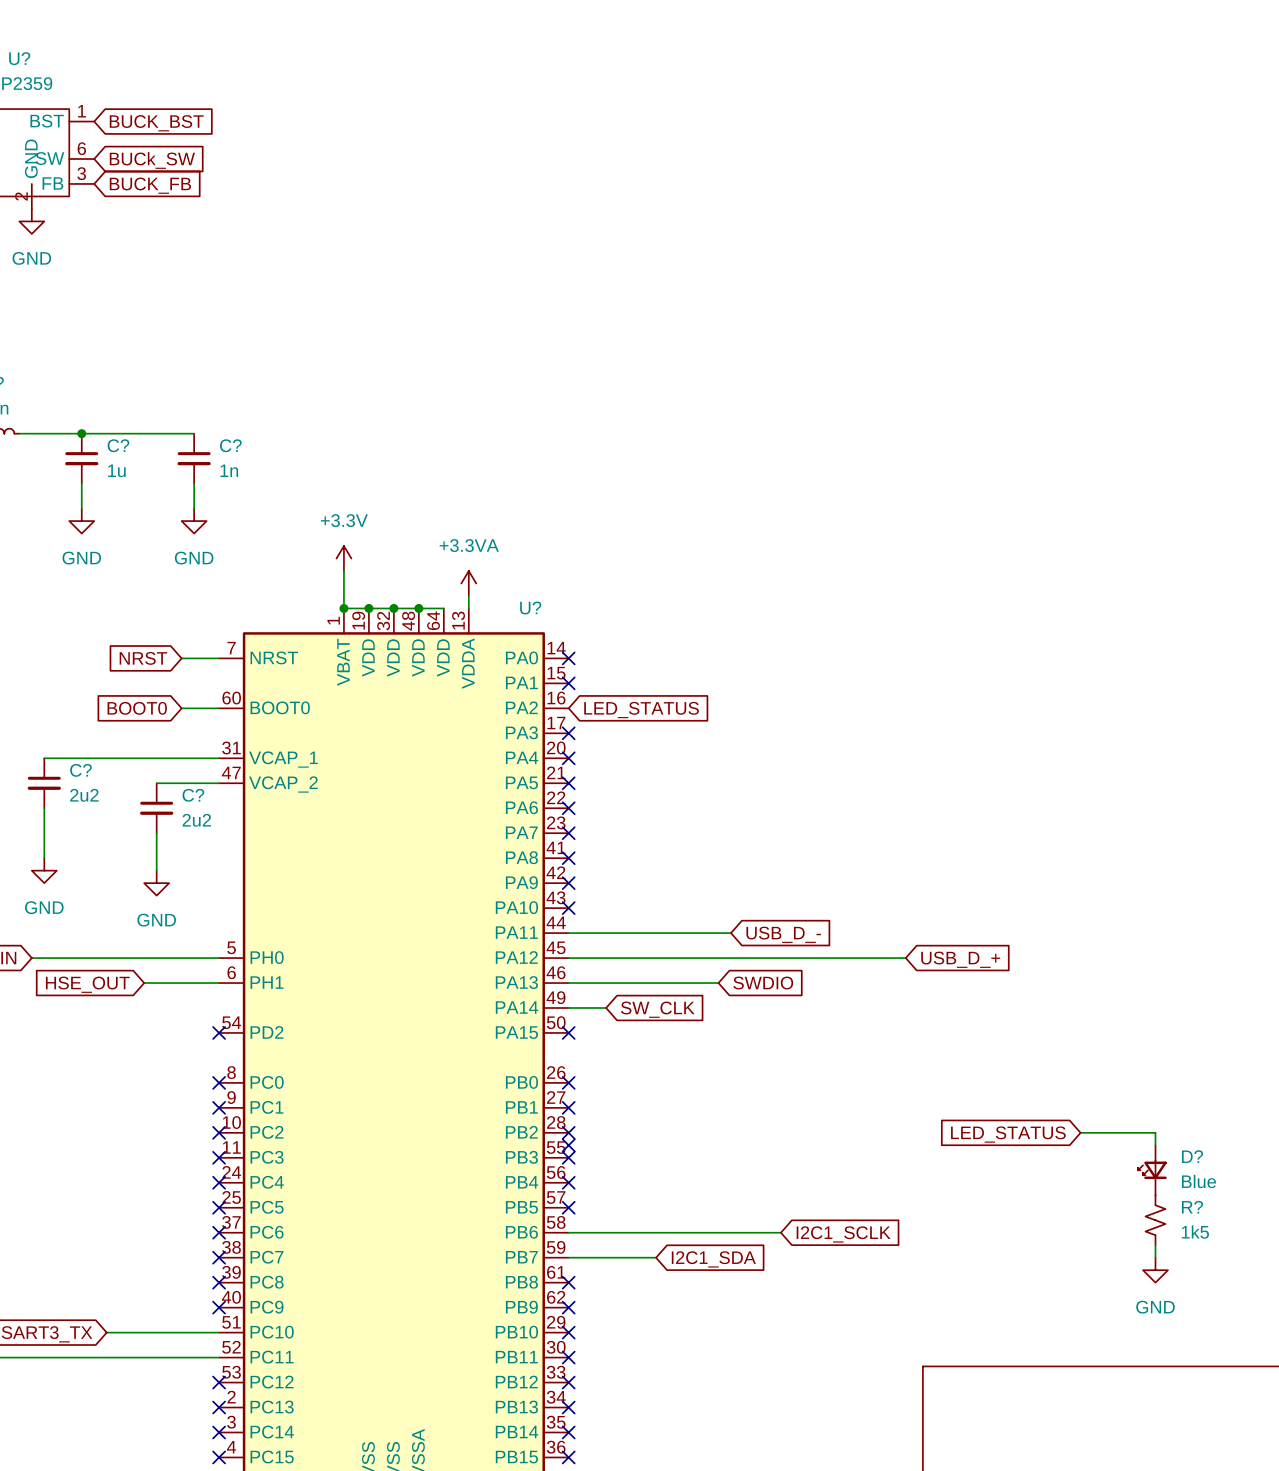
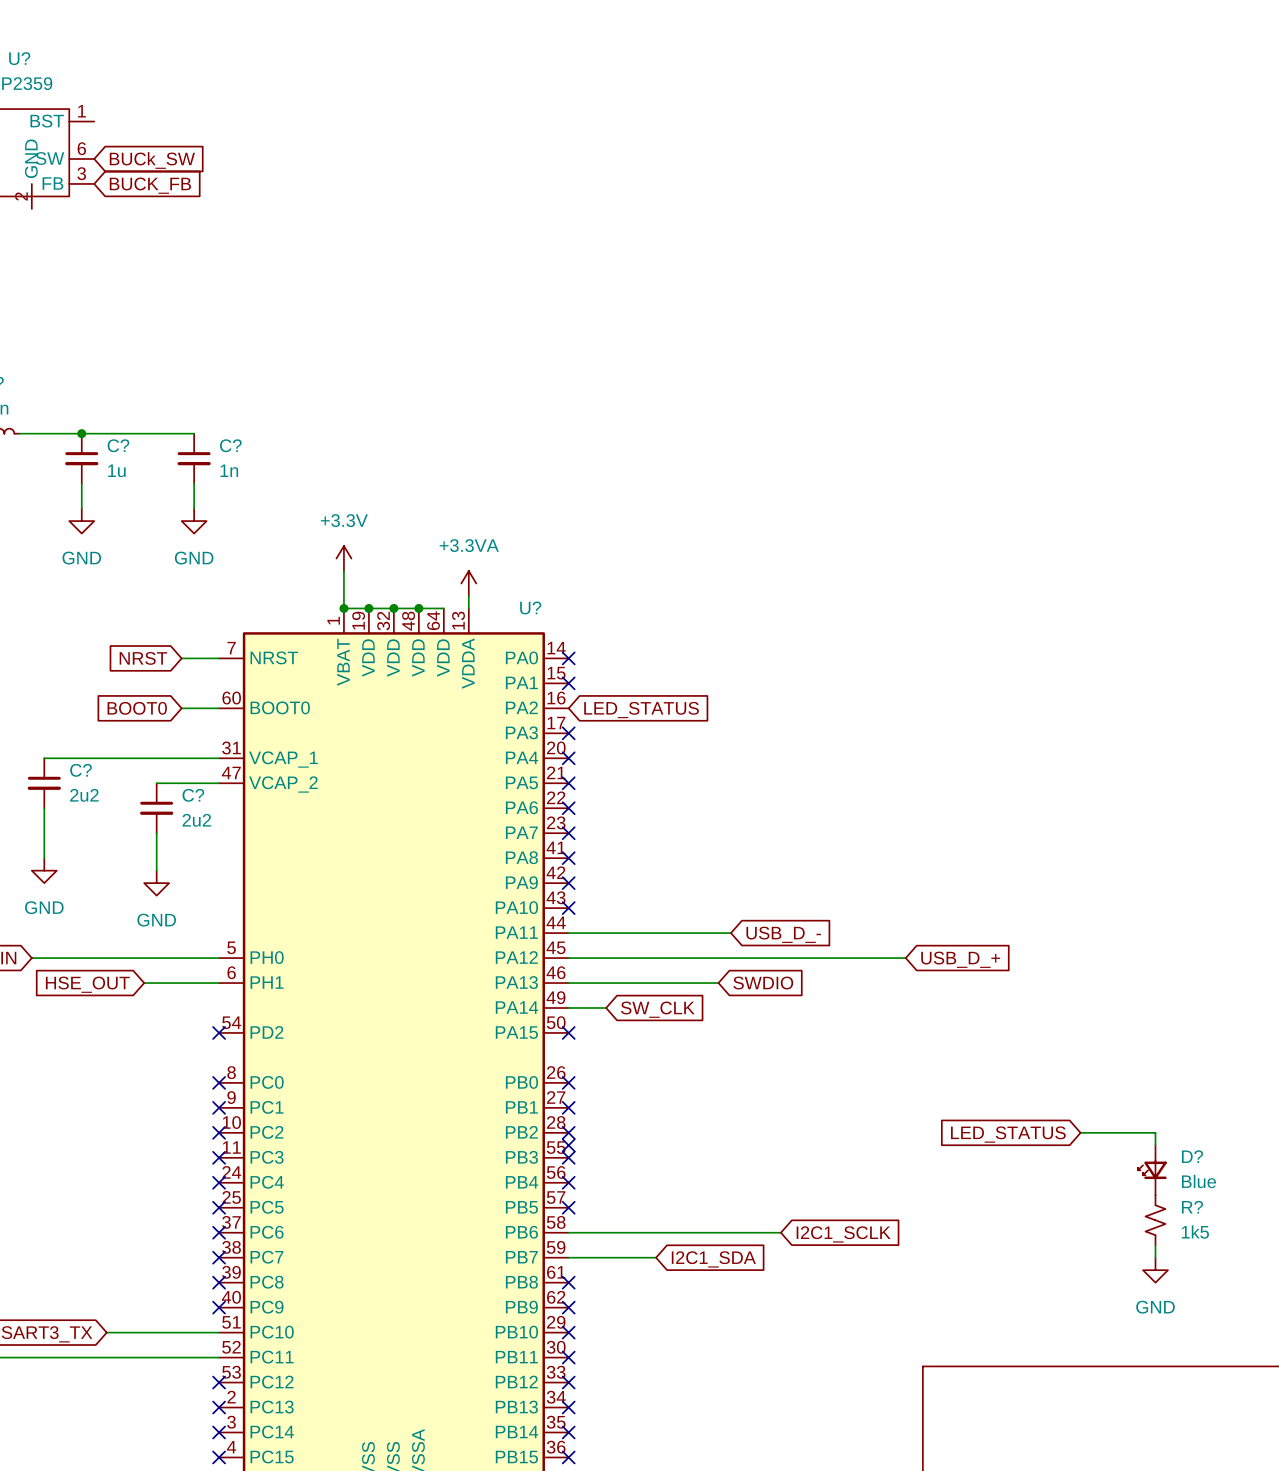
global label: BUCK_BST (156, 123) -> none
power symbol: GND (31, 221) -> none

